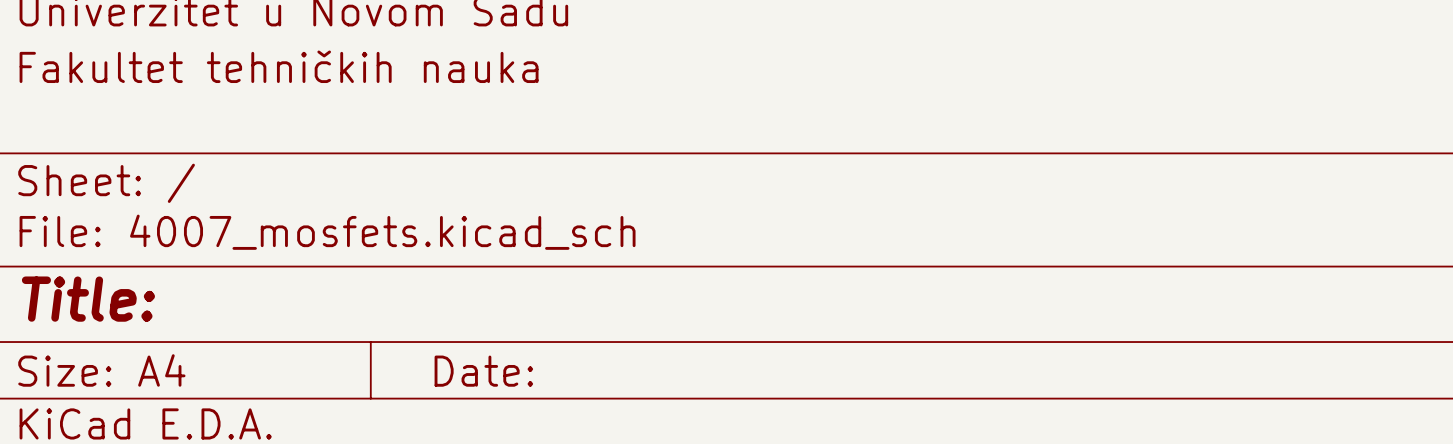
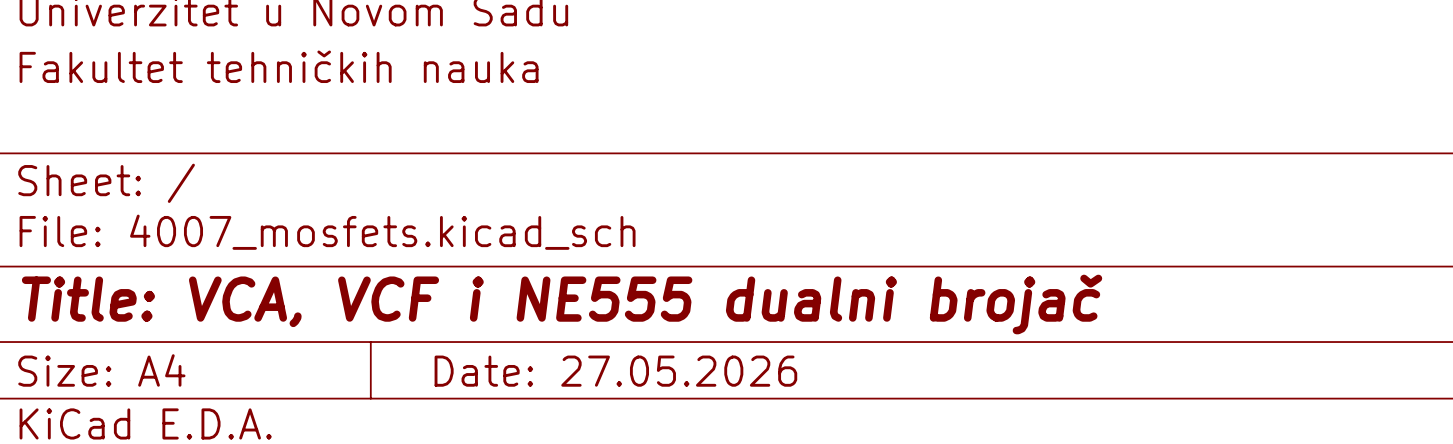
title block: Title: (88, 299) -> Title: VCA, VCF i NE555 dualni brojač (562, 304)
title block: Date: (483, 371) -> Date: 27.05.2026 (615, 371)

